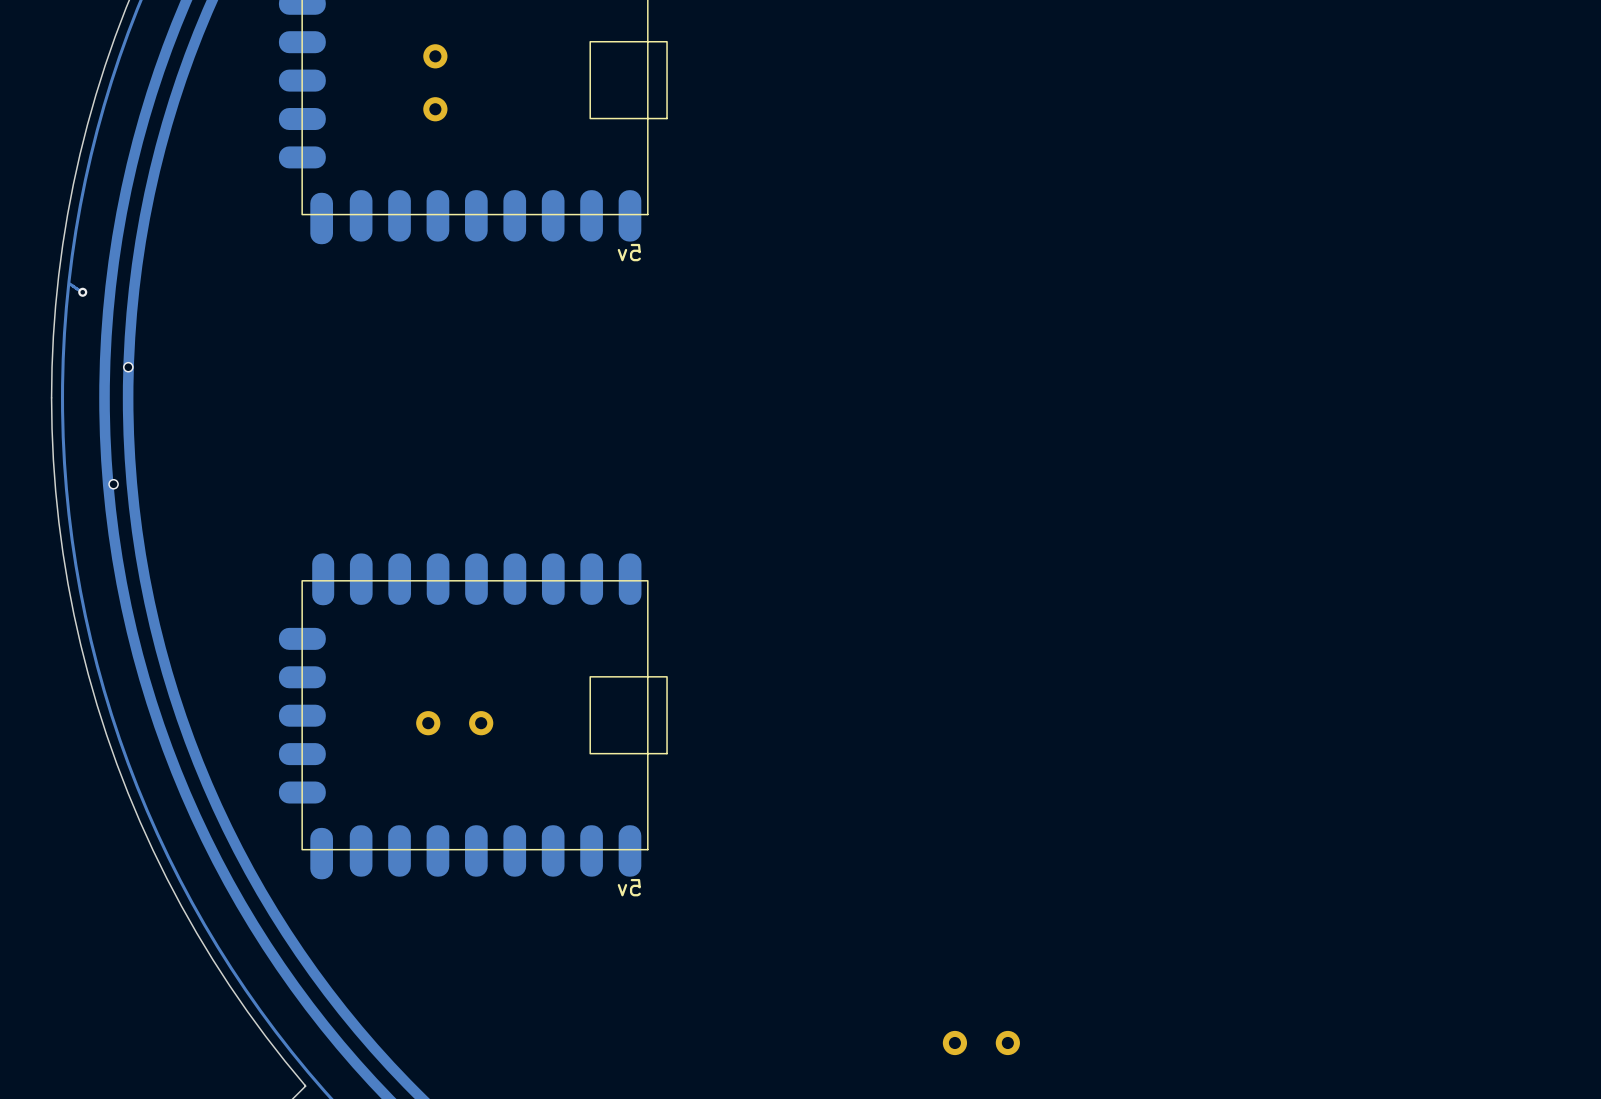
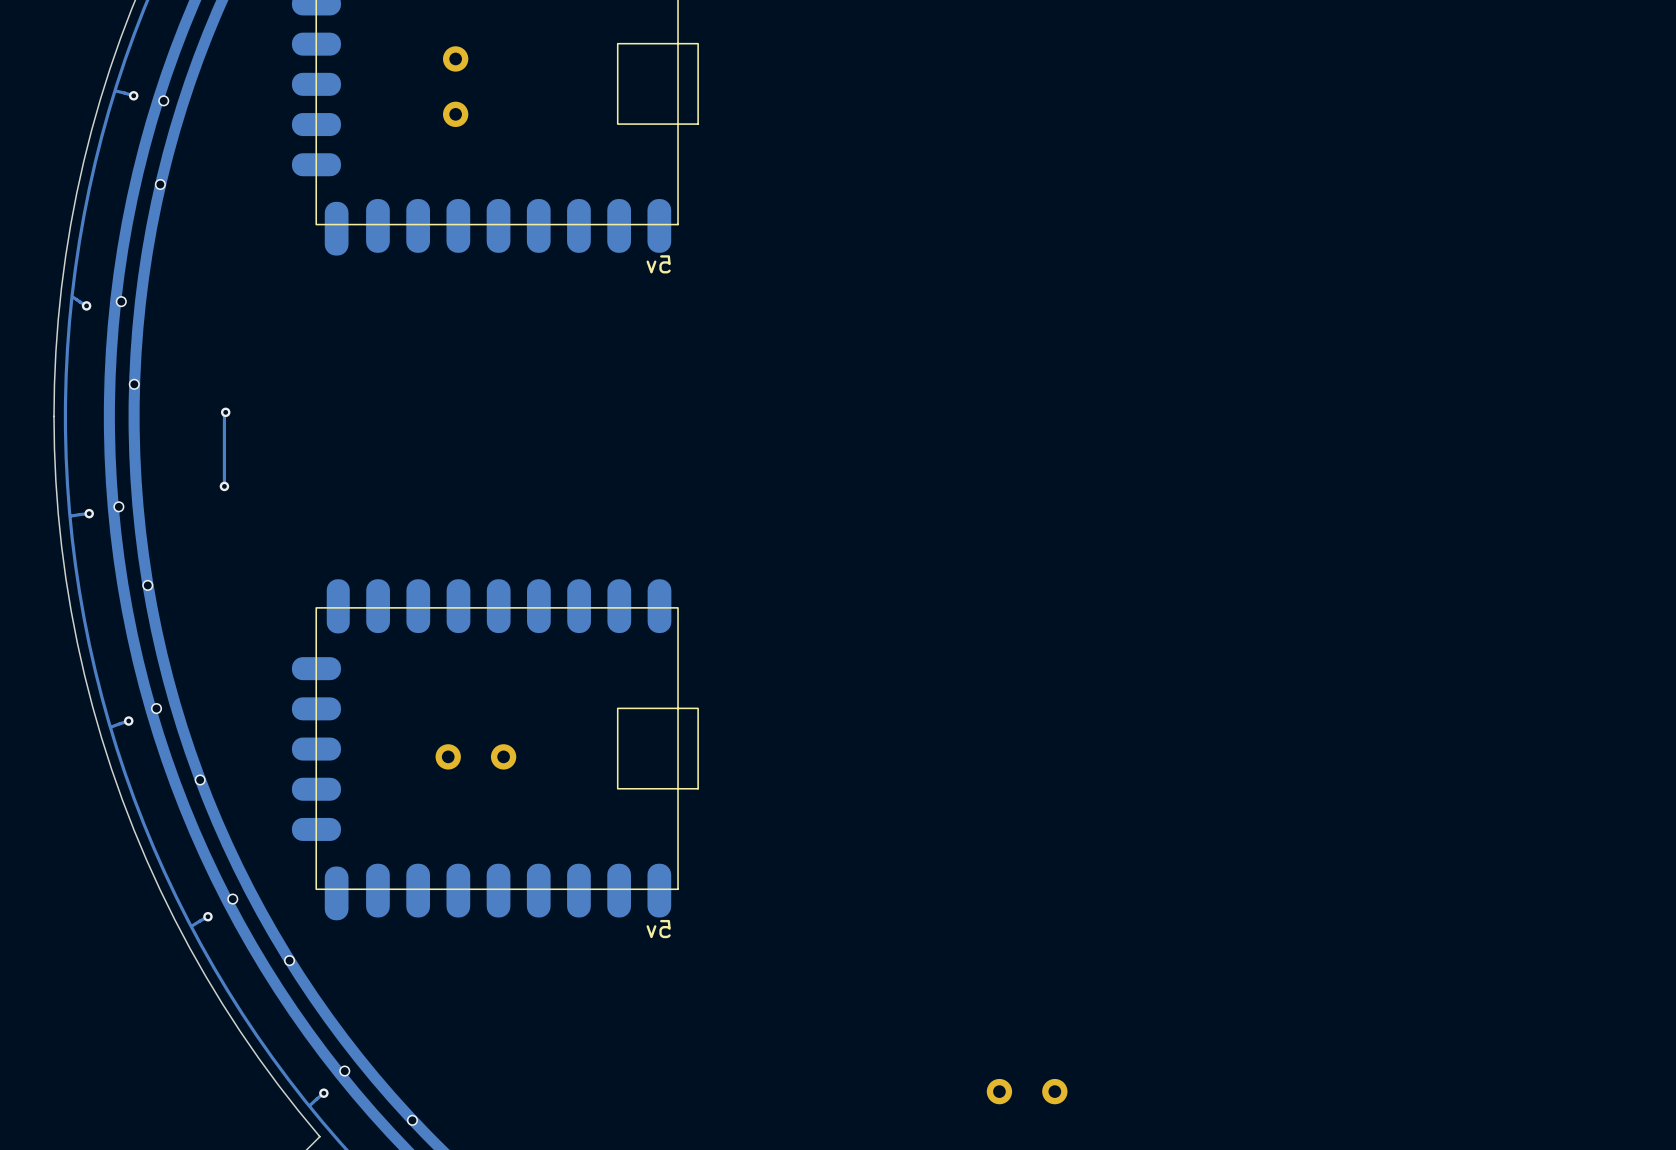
track: none -> (116, 91) (133, 95)
via: none -> (133, 95)
via: none -> (163, 100)
via: none -> (160, 184)
via: none -> (121, 301)
track: none -> (225, 412) (224, 486)
via: none -> (225, 412)
via: none -> (224, 486)
track: none -> (89, 513) (71, 515)
via: none -> (89, 513)
via: none -> (147, 585)
via: none -> (156, 708)
track: none -> (128, 721) (111, 726)
via: none -> (128, 721)
via: none -> (200, 780)
via: none -> (232, 899)
track: none -> (207, 916) (192, 925)
via: none -> (207, 916)
via: none -> (289, 960)
via: none -> (344, 1071)
track: none -> (323, 1093) (310, 1104)
via: none -> (323, 1093)
via: none -> (412, 1120)

